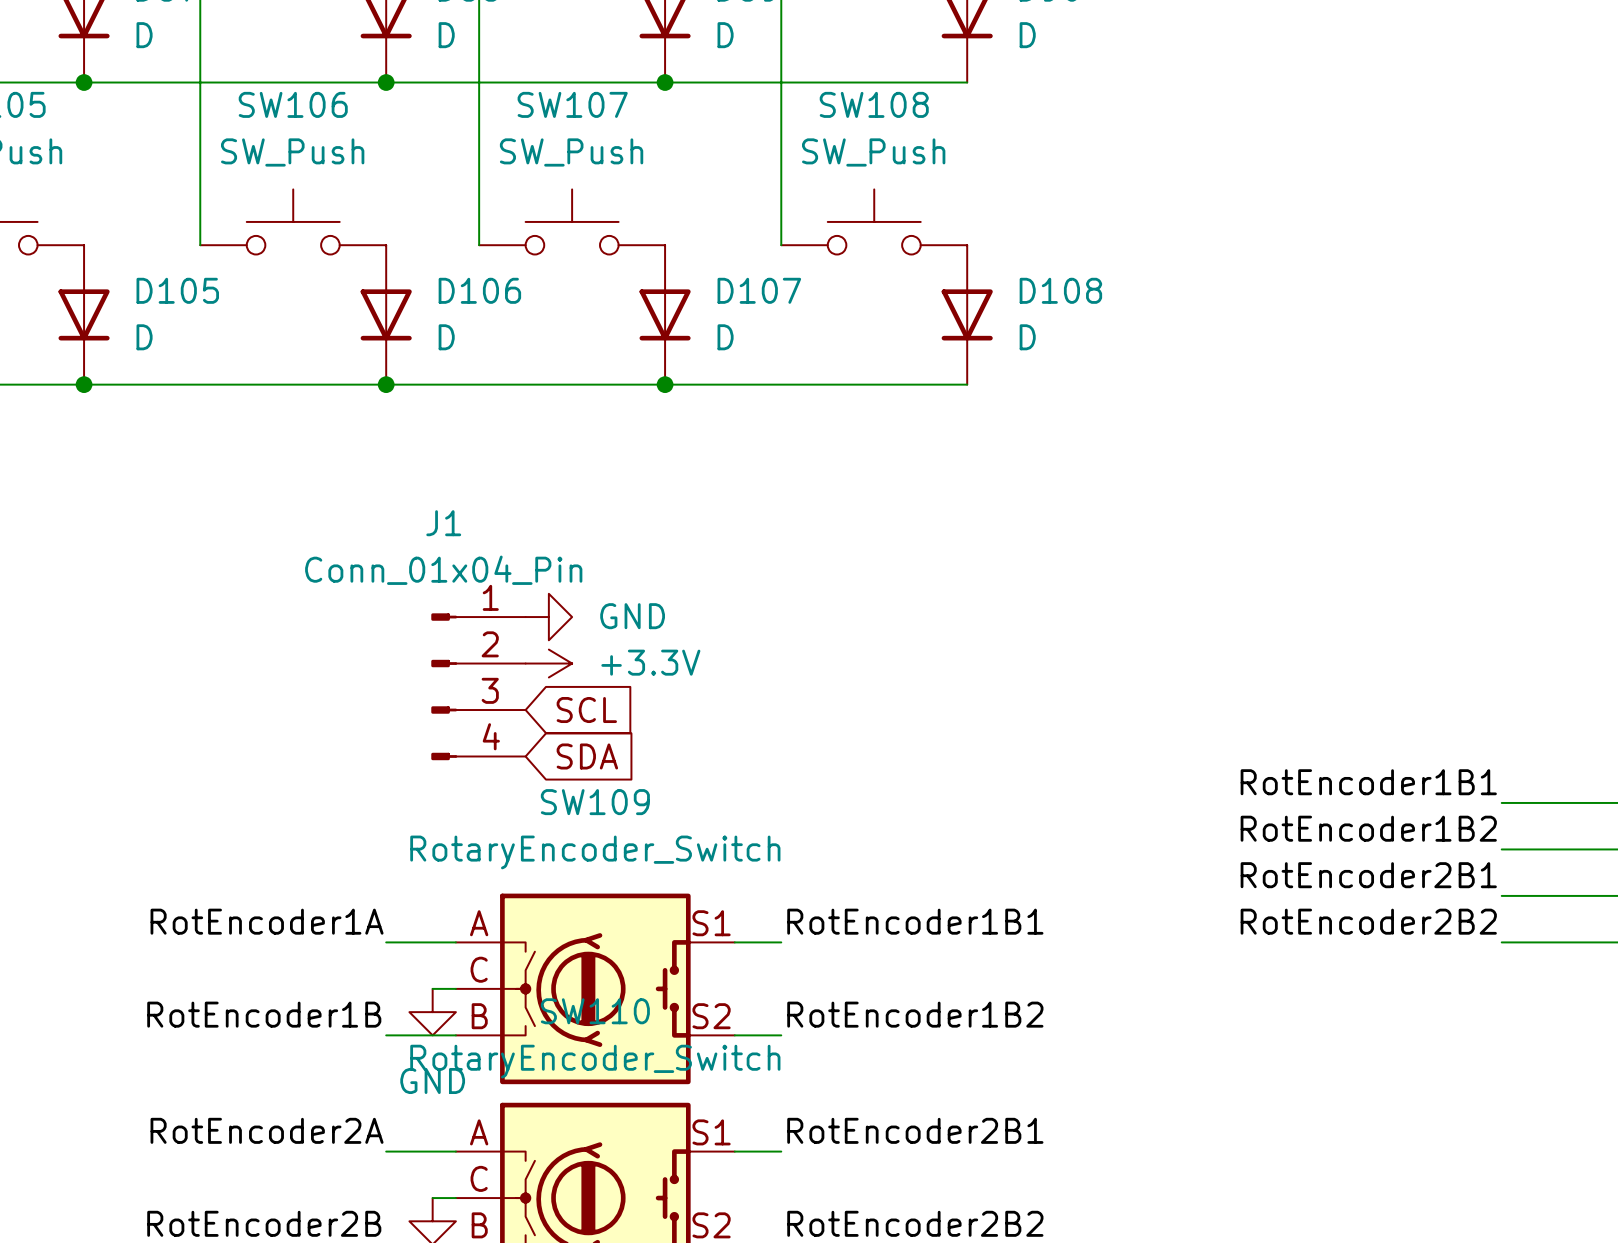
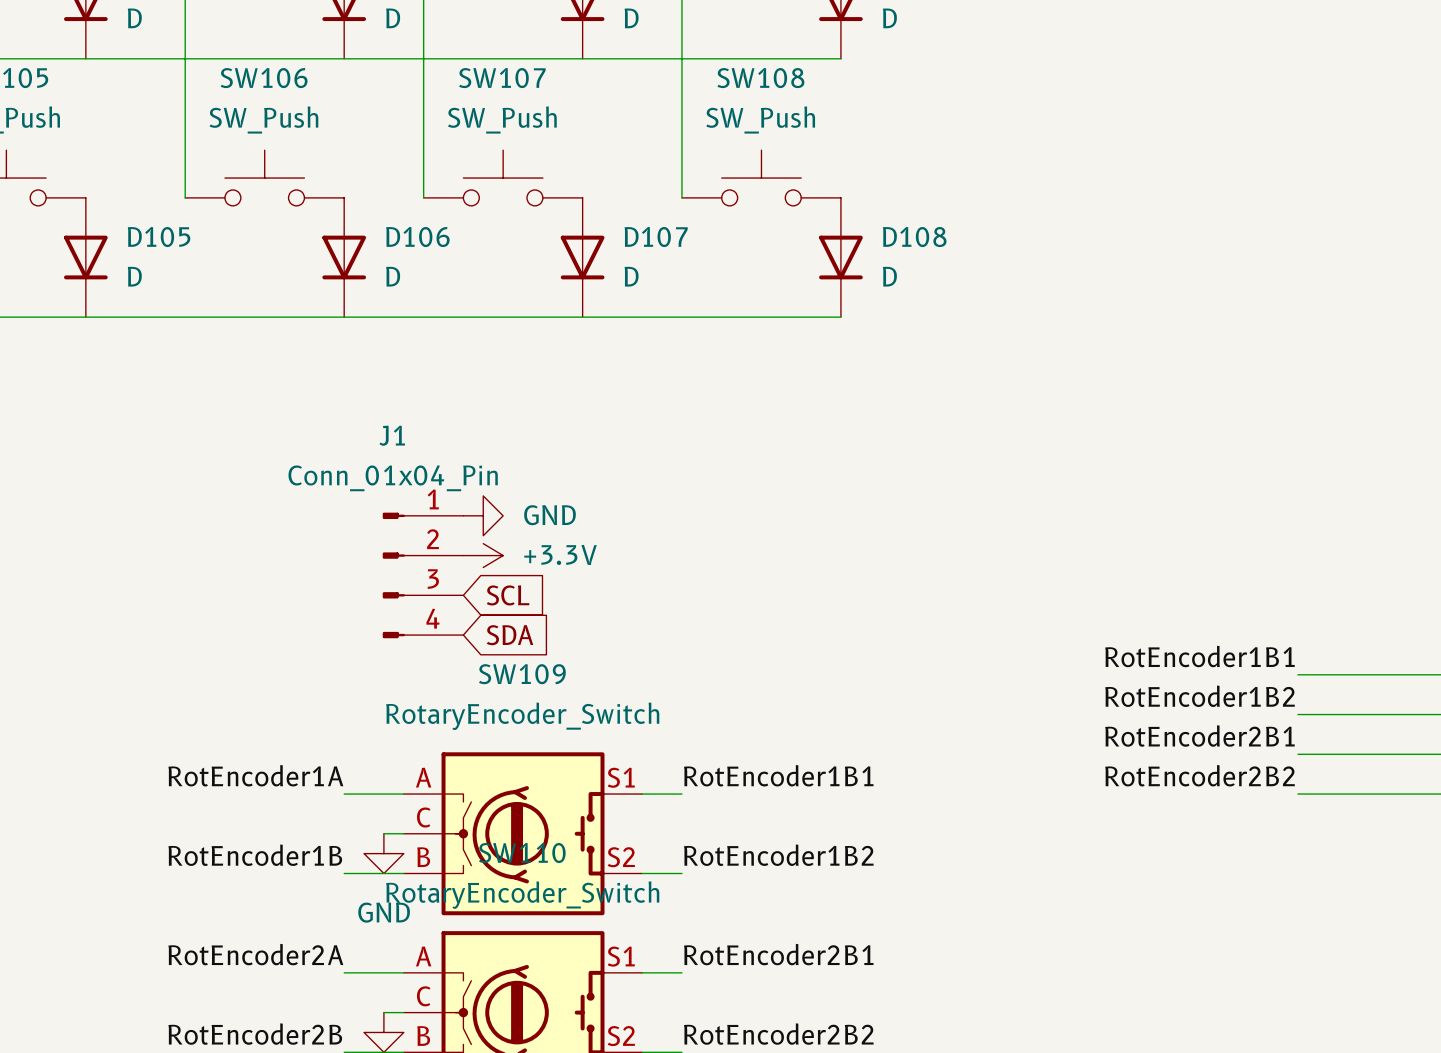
junction: (84, 82) -> none
junction: (386, 82) -> none
junction: (665, 82) -> none
junction: (84, 384) -> none
junction: (386, 384) -> none
junction: (665, 384) -> none

